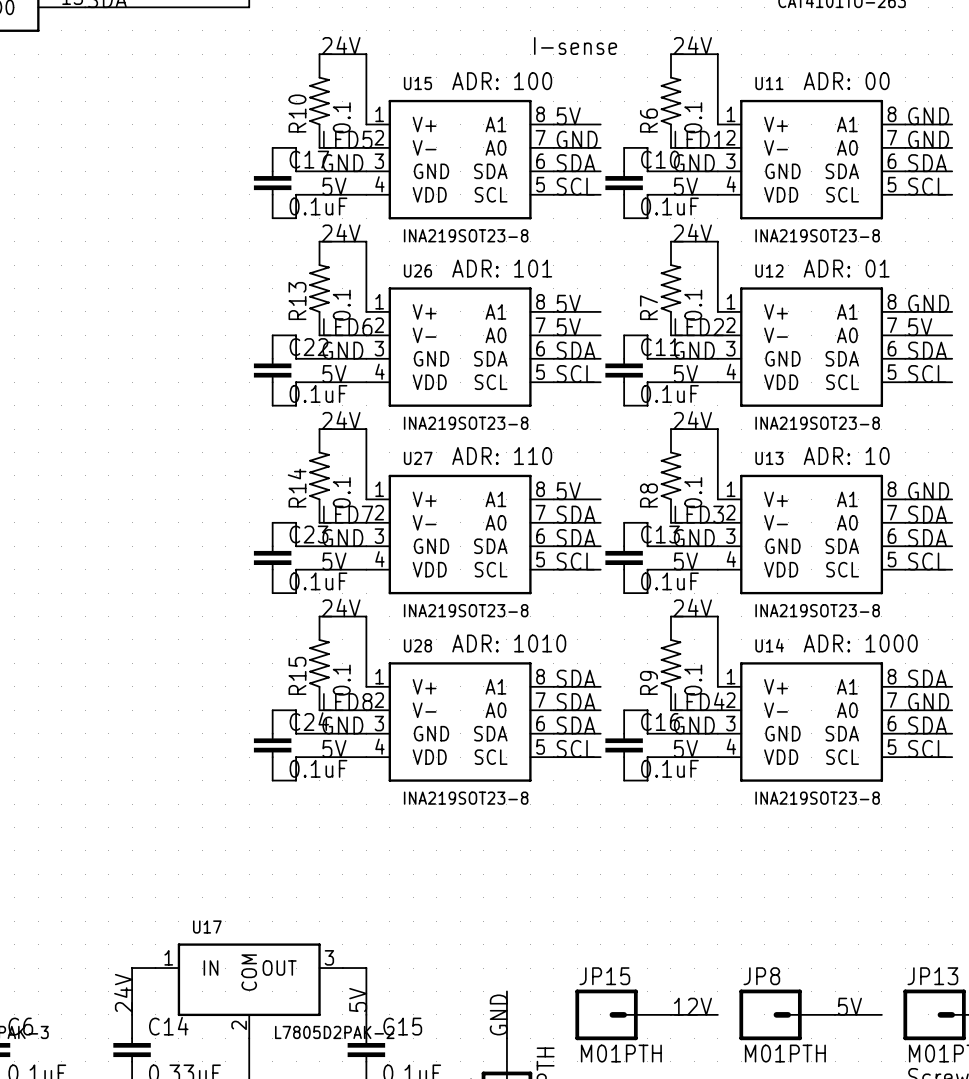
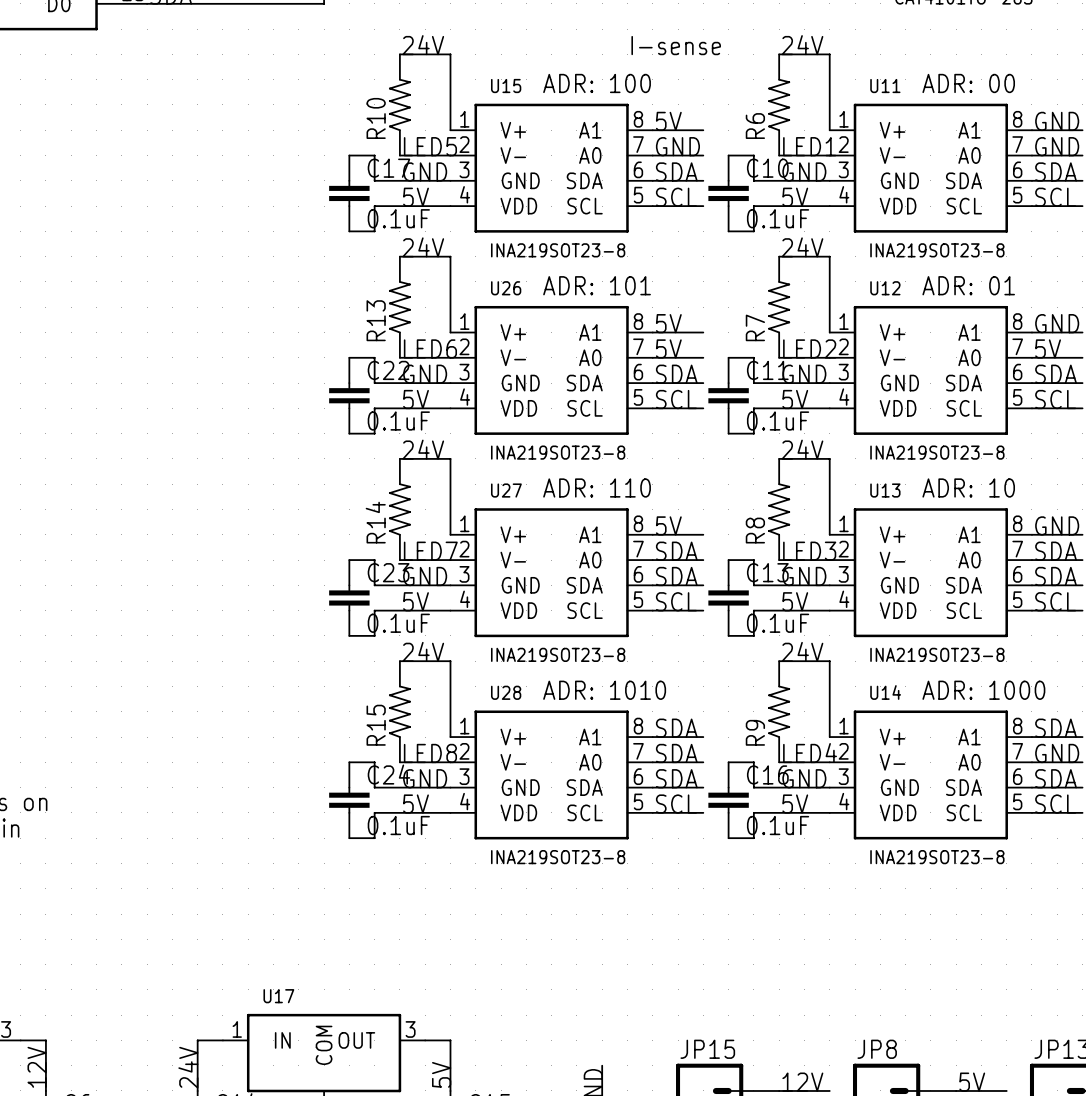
R10 value: 0.1 (341, 117) -> none
R6 value: 0.1 (693, 117) -> none
R13 value: 0.1 (341, 305) -> none
R7 value: 0.1 (693, 305) -> none
R14 value: 0.1 (341, 492) -> none
R8 value: 0.1 (693, 492) -> none
R15 value: 0.1 (341, 680) -> none
R9 value: 0.1 (693, 680) -> none

